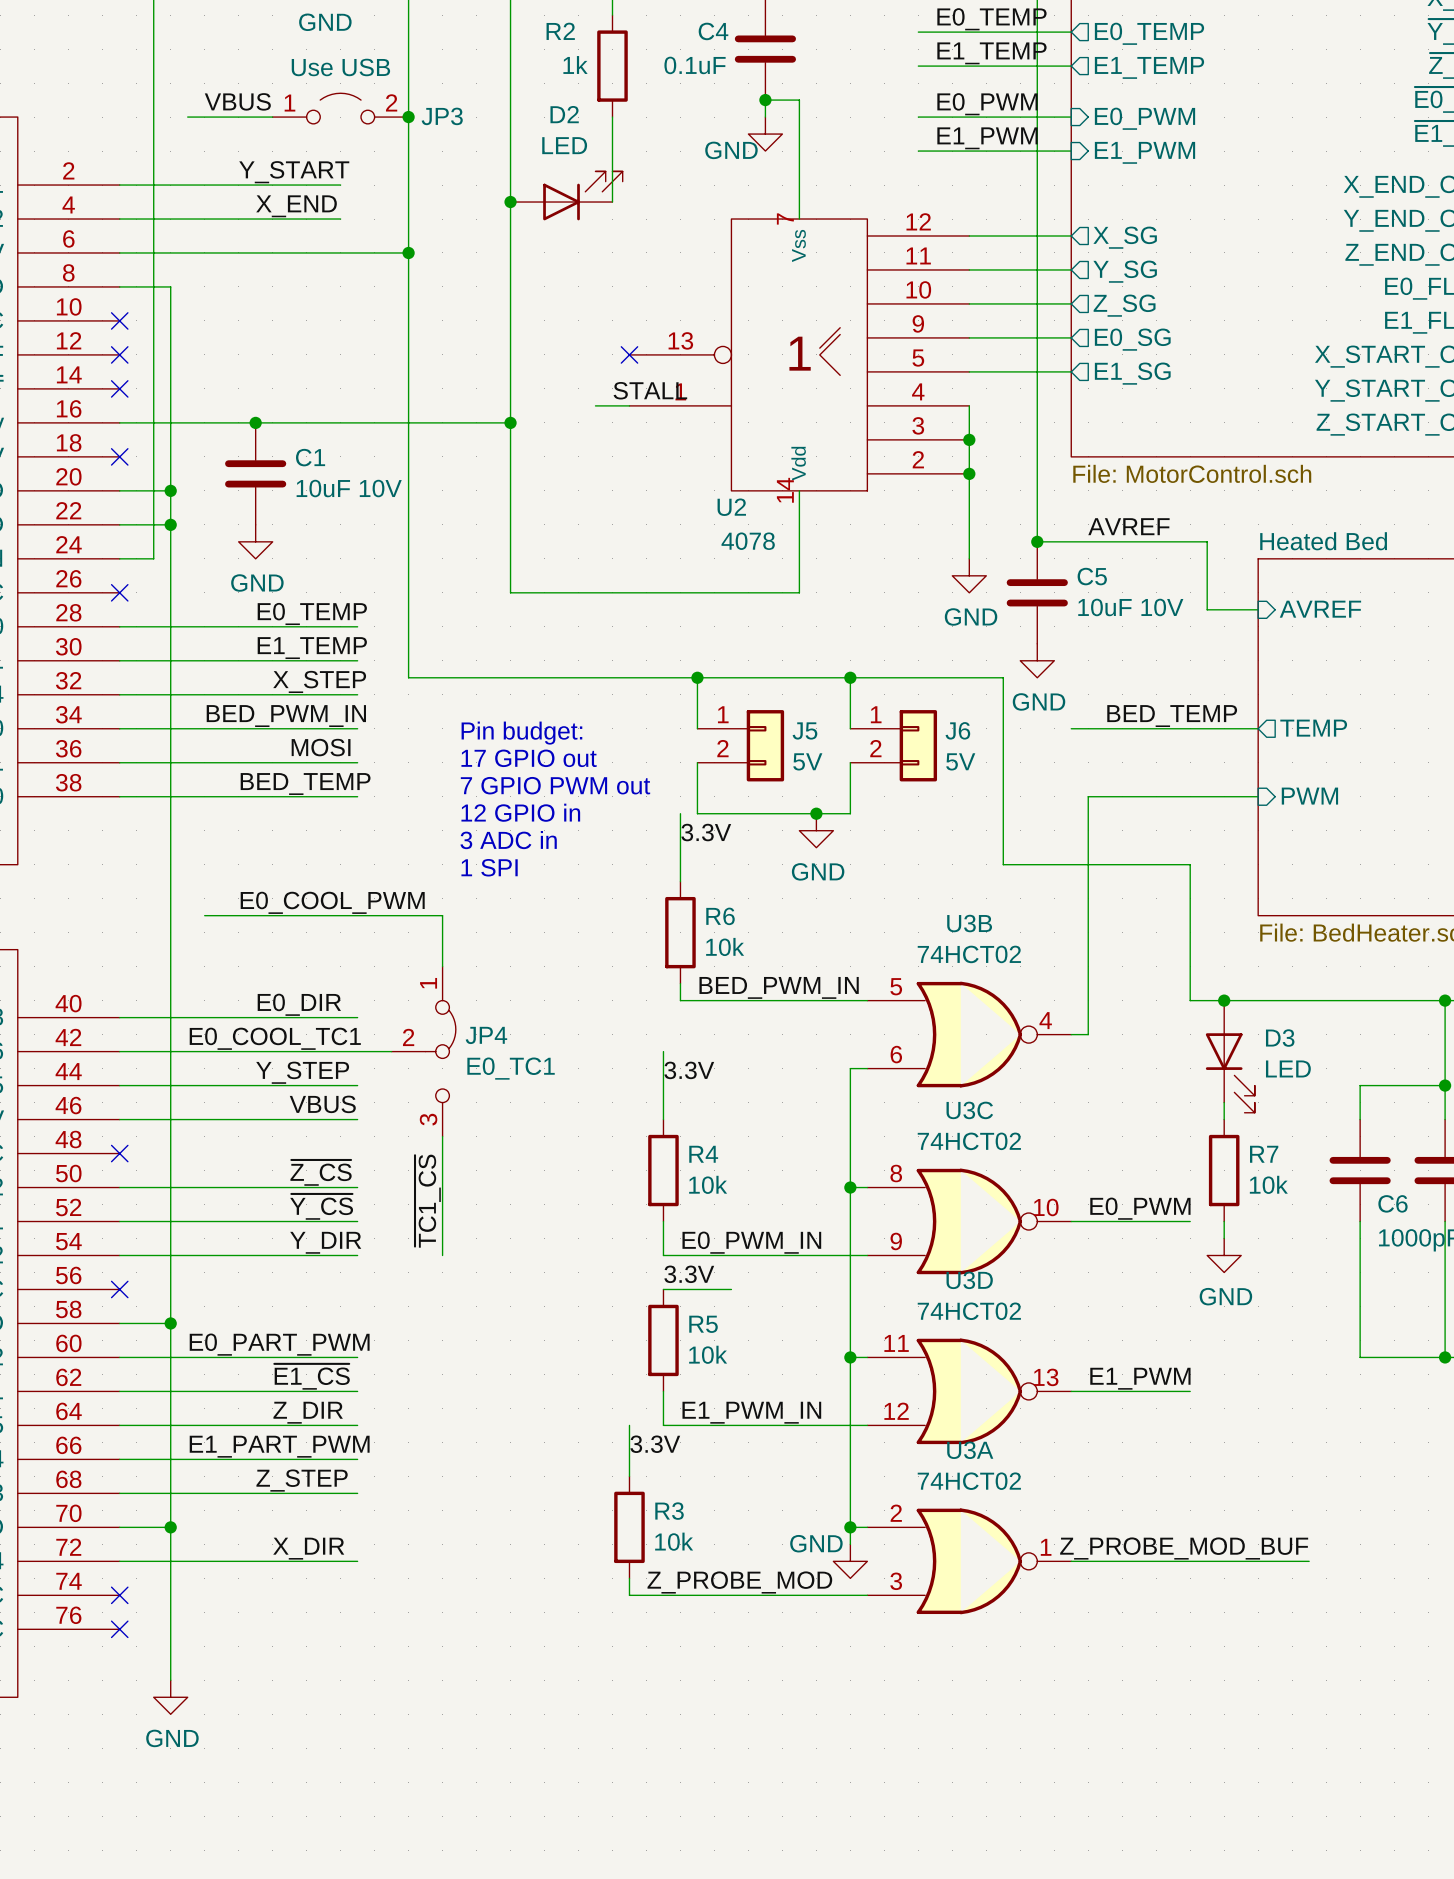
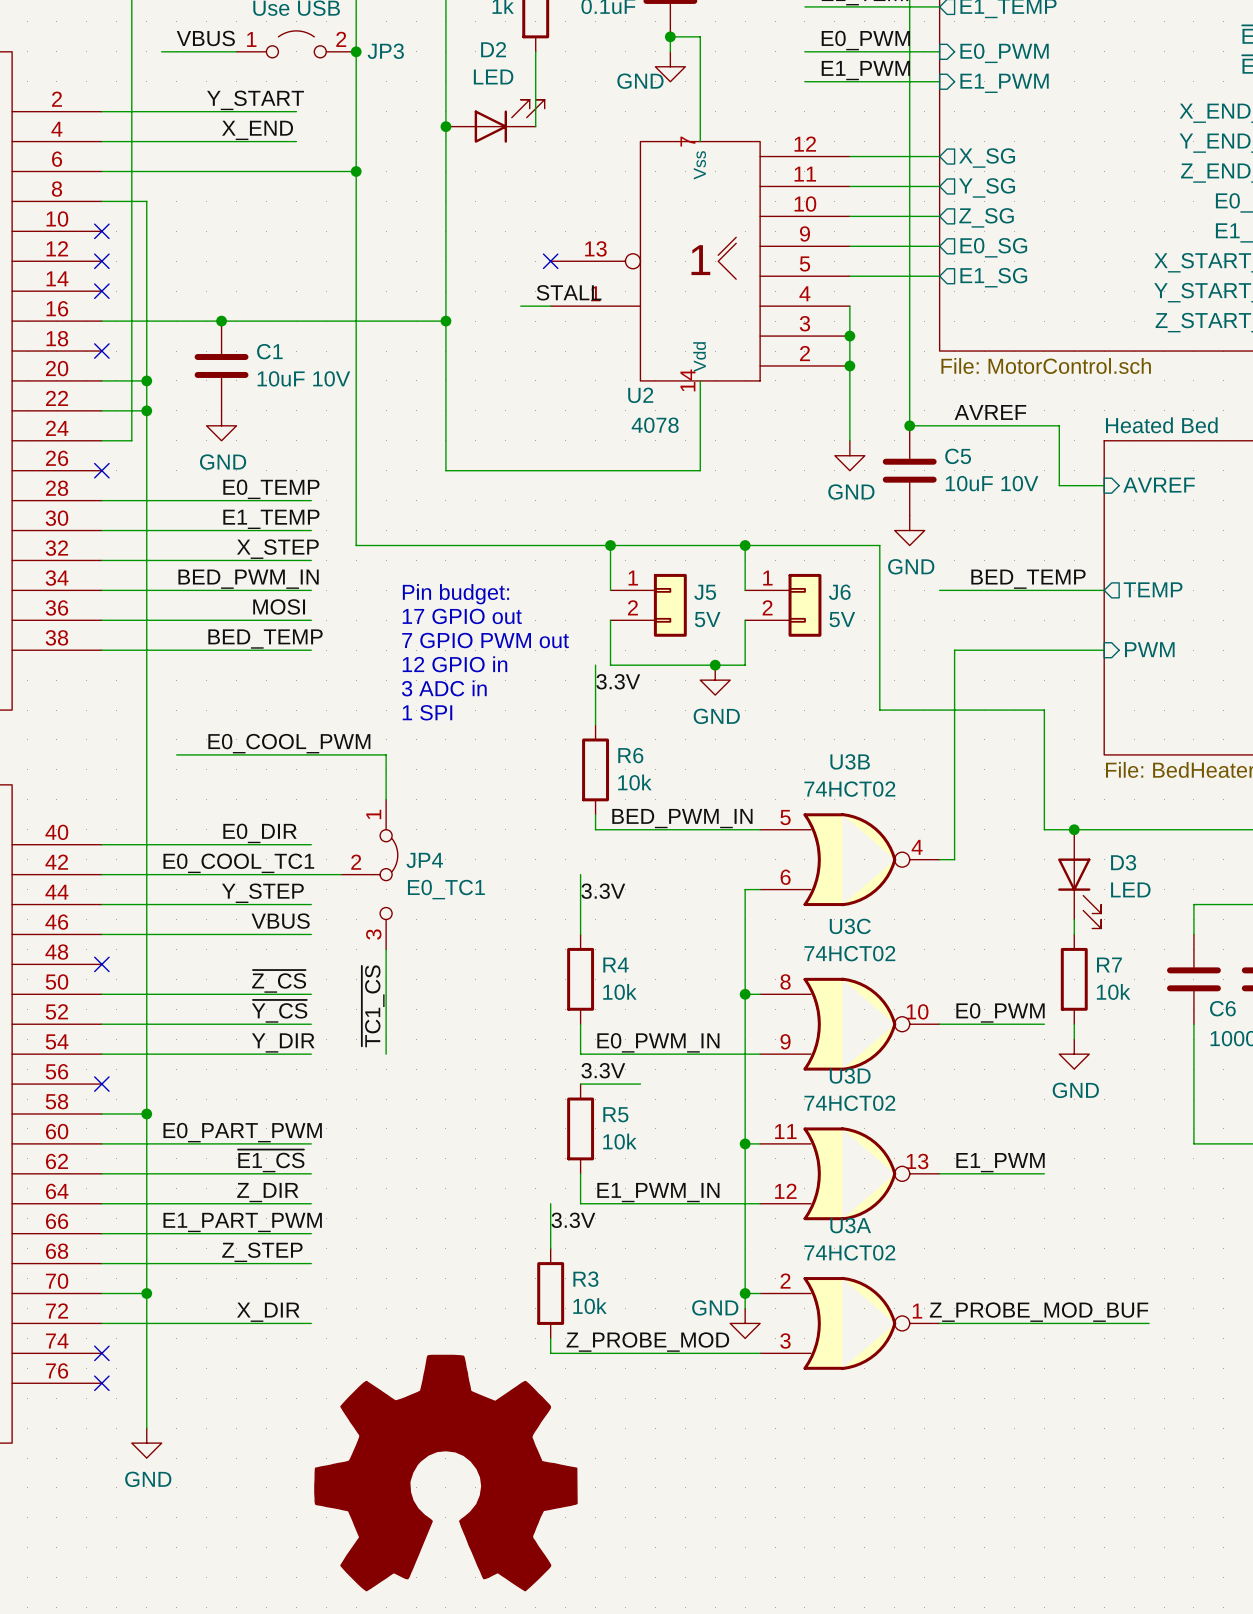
part: none -> (445, 1473)

